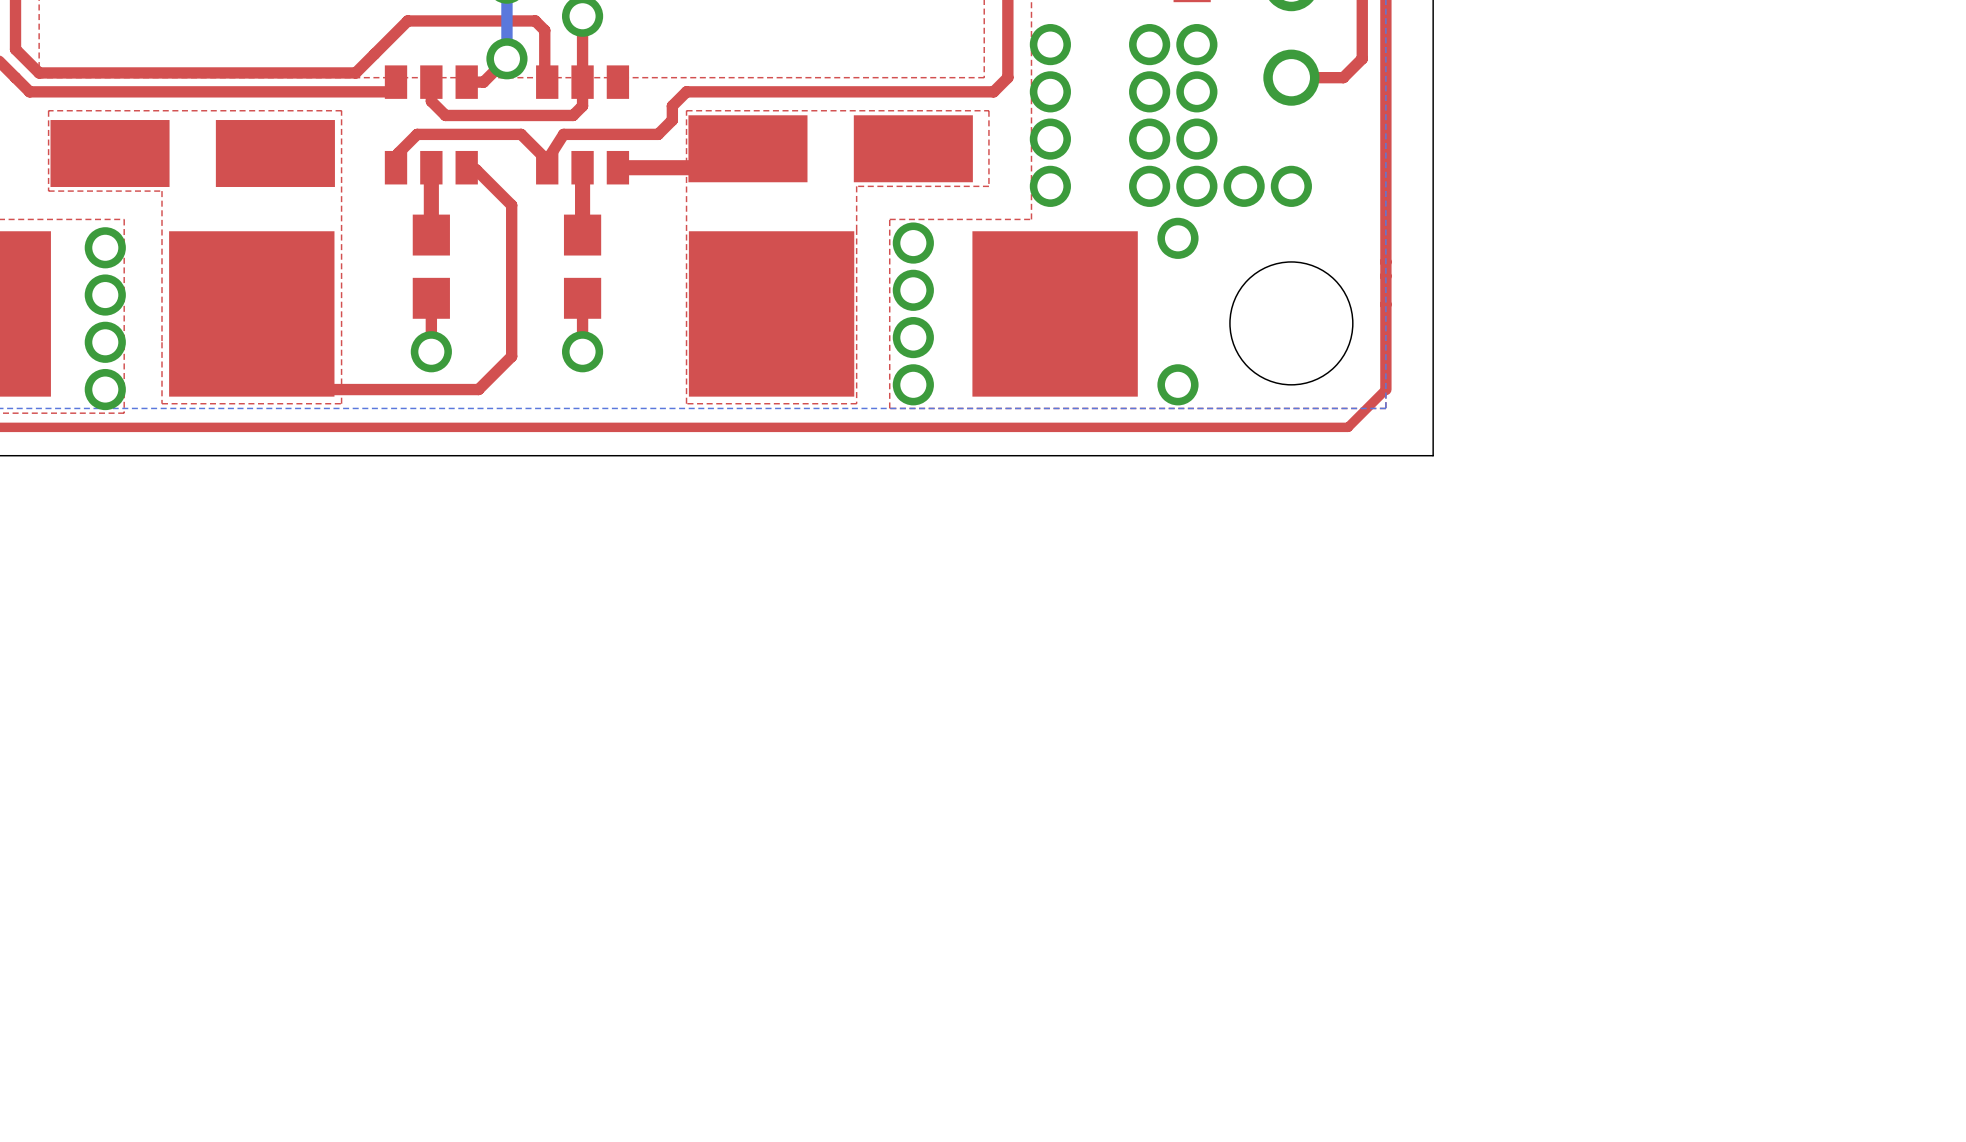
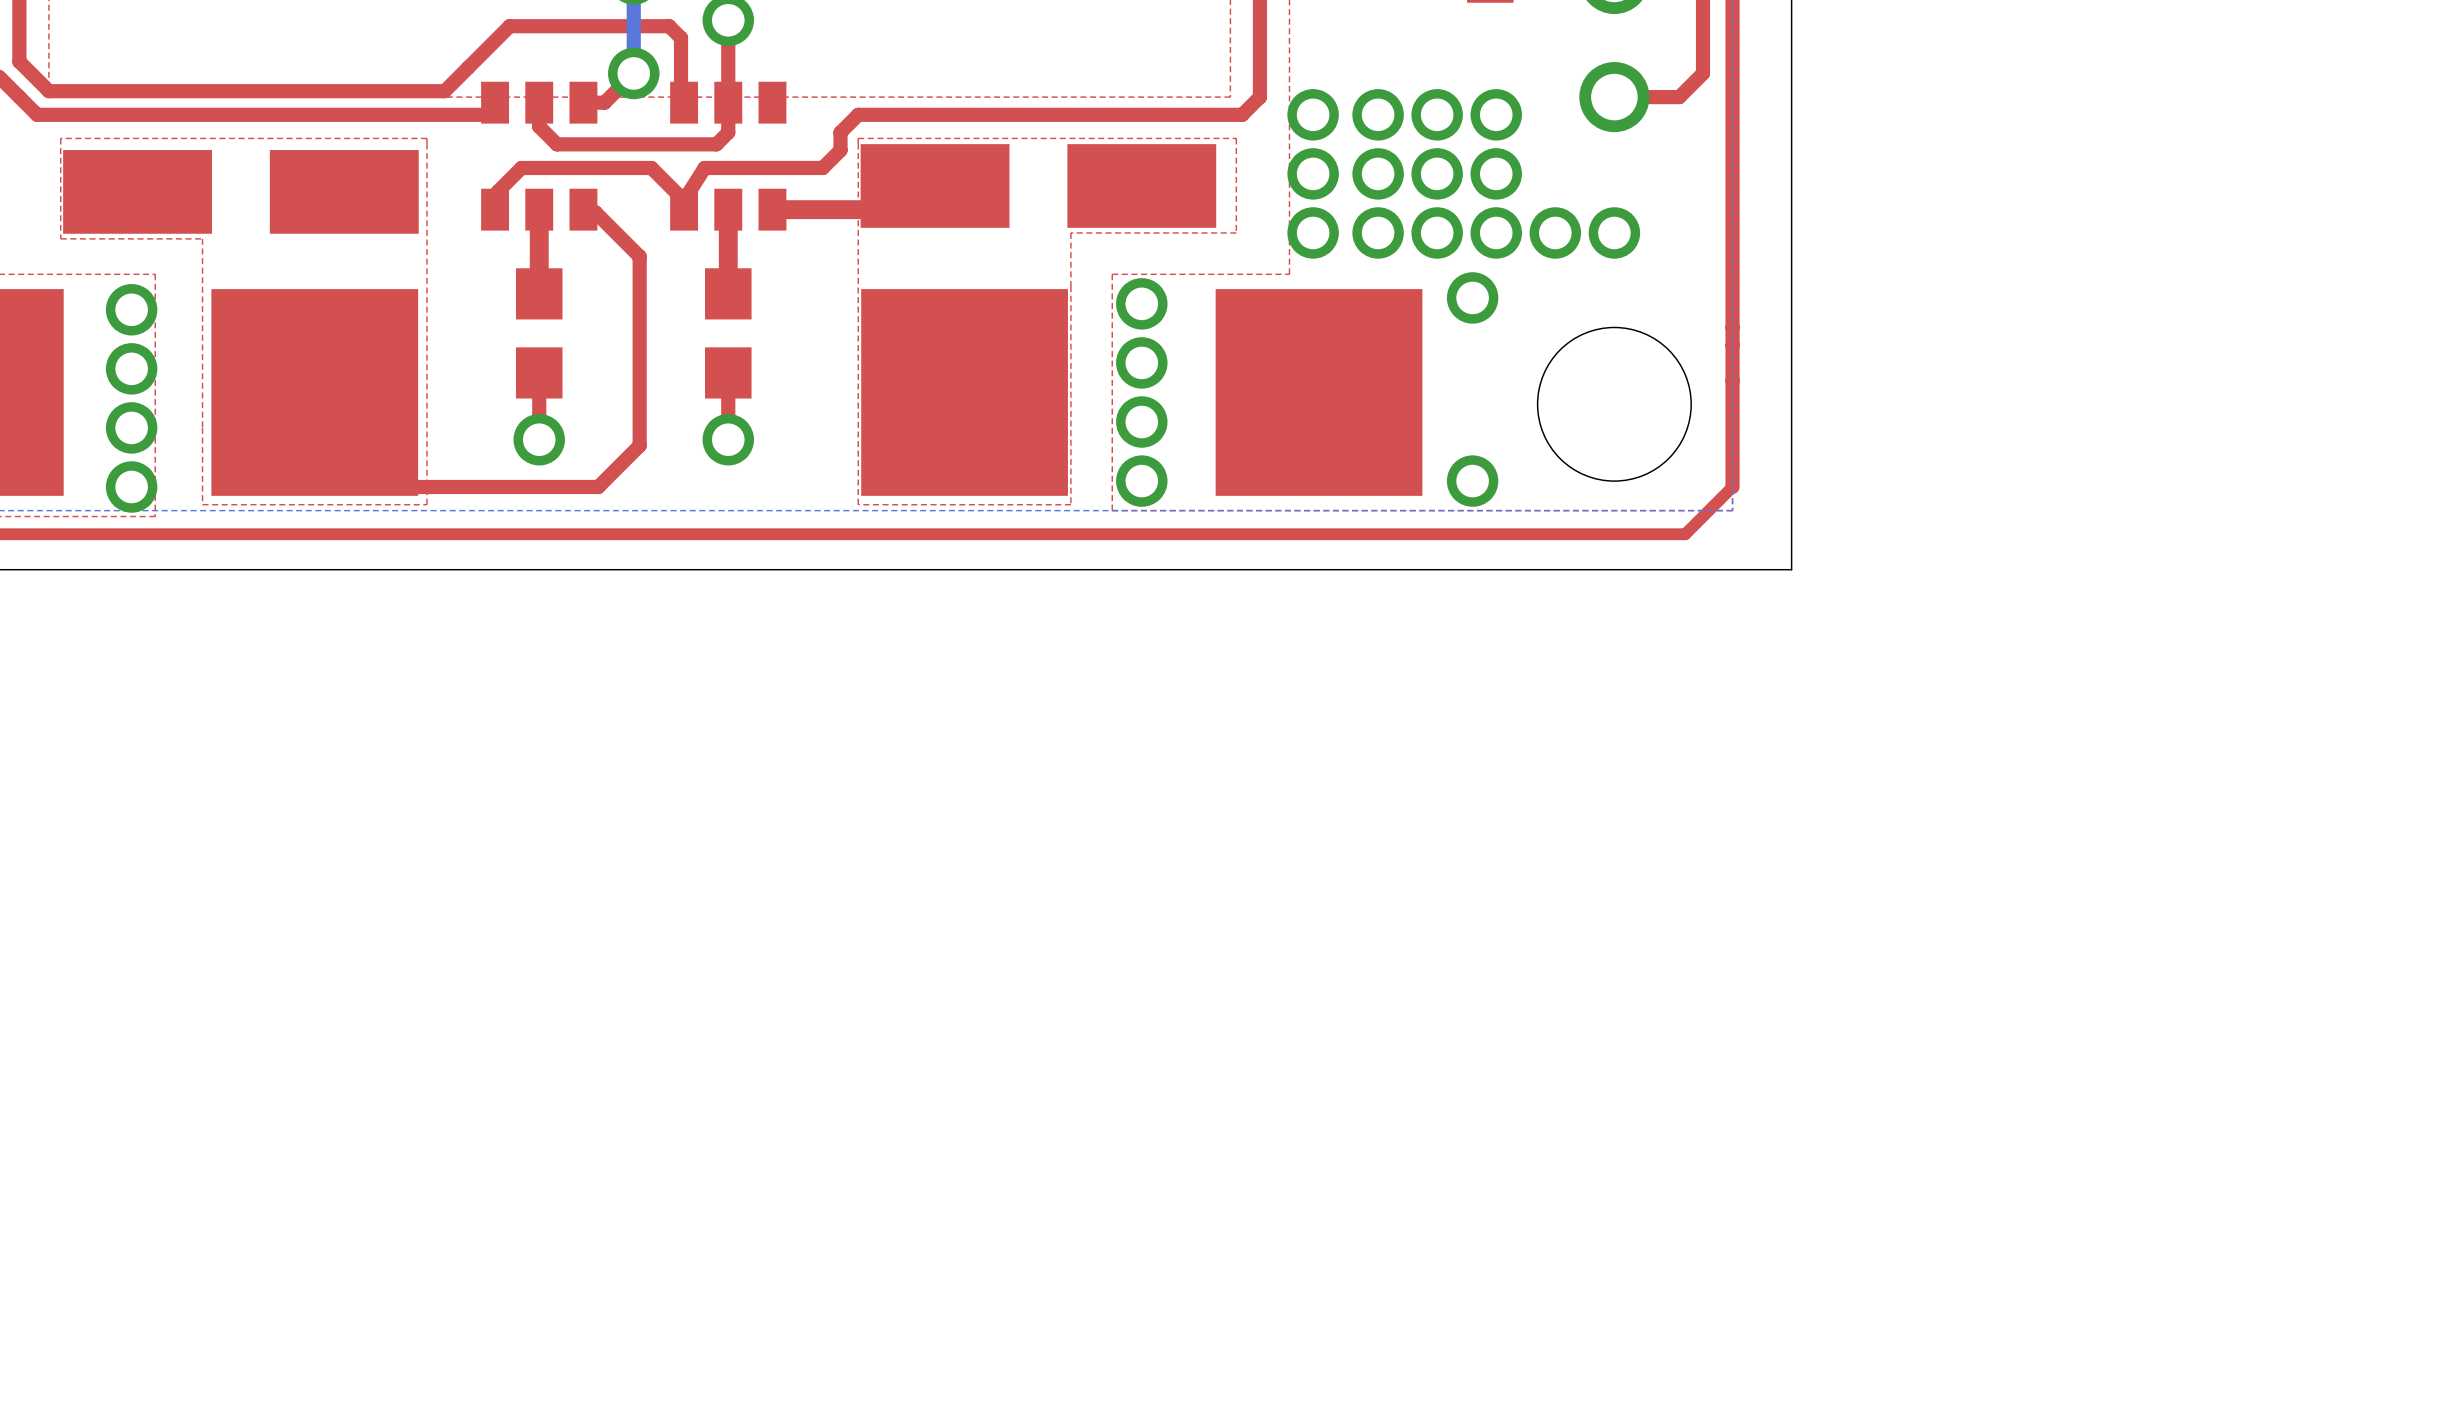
via: (1050, 44) -> none
via: (1149, 44) -> none
via: (1196, 44) -> none
via: none -> (1378, 114)
via: none -> (1378, 173)
via: none -> (1378, 232)

